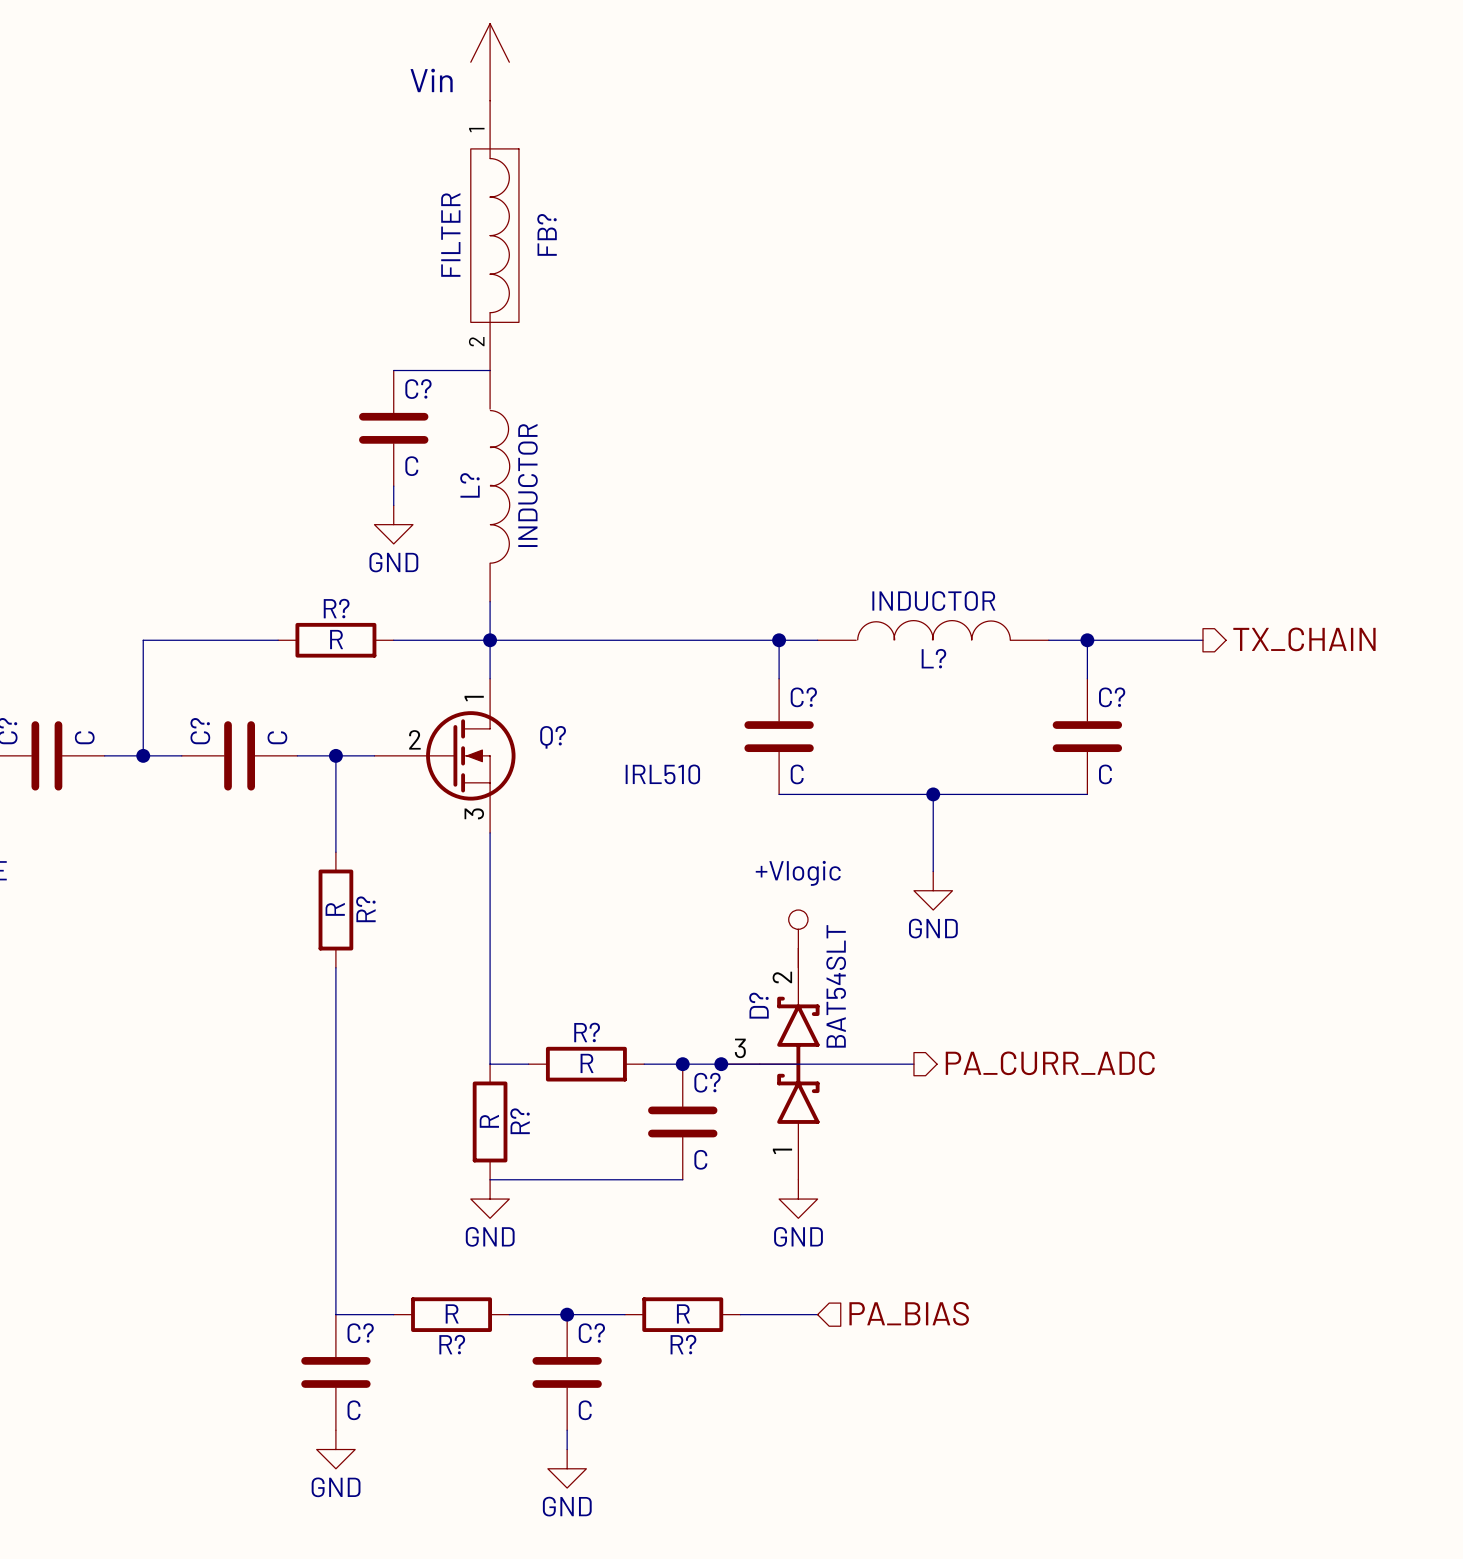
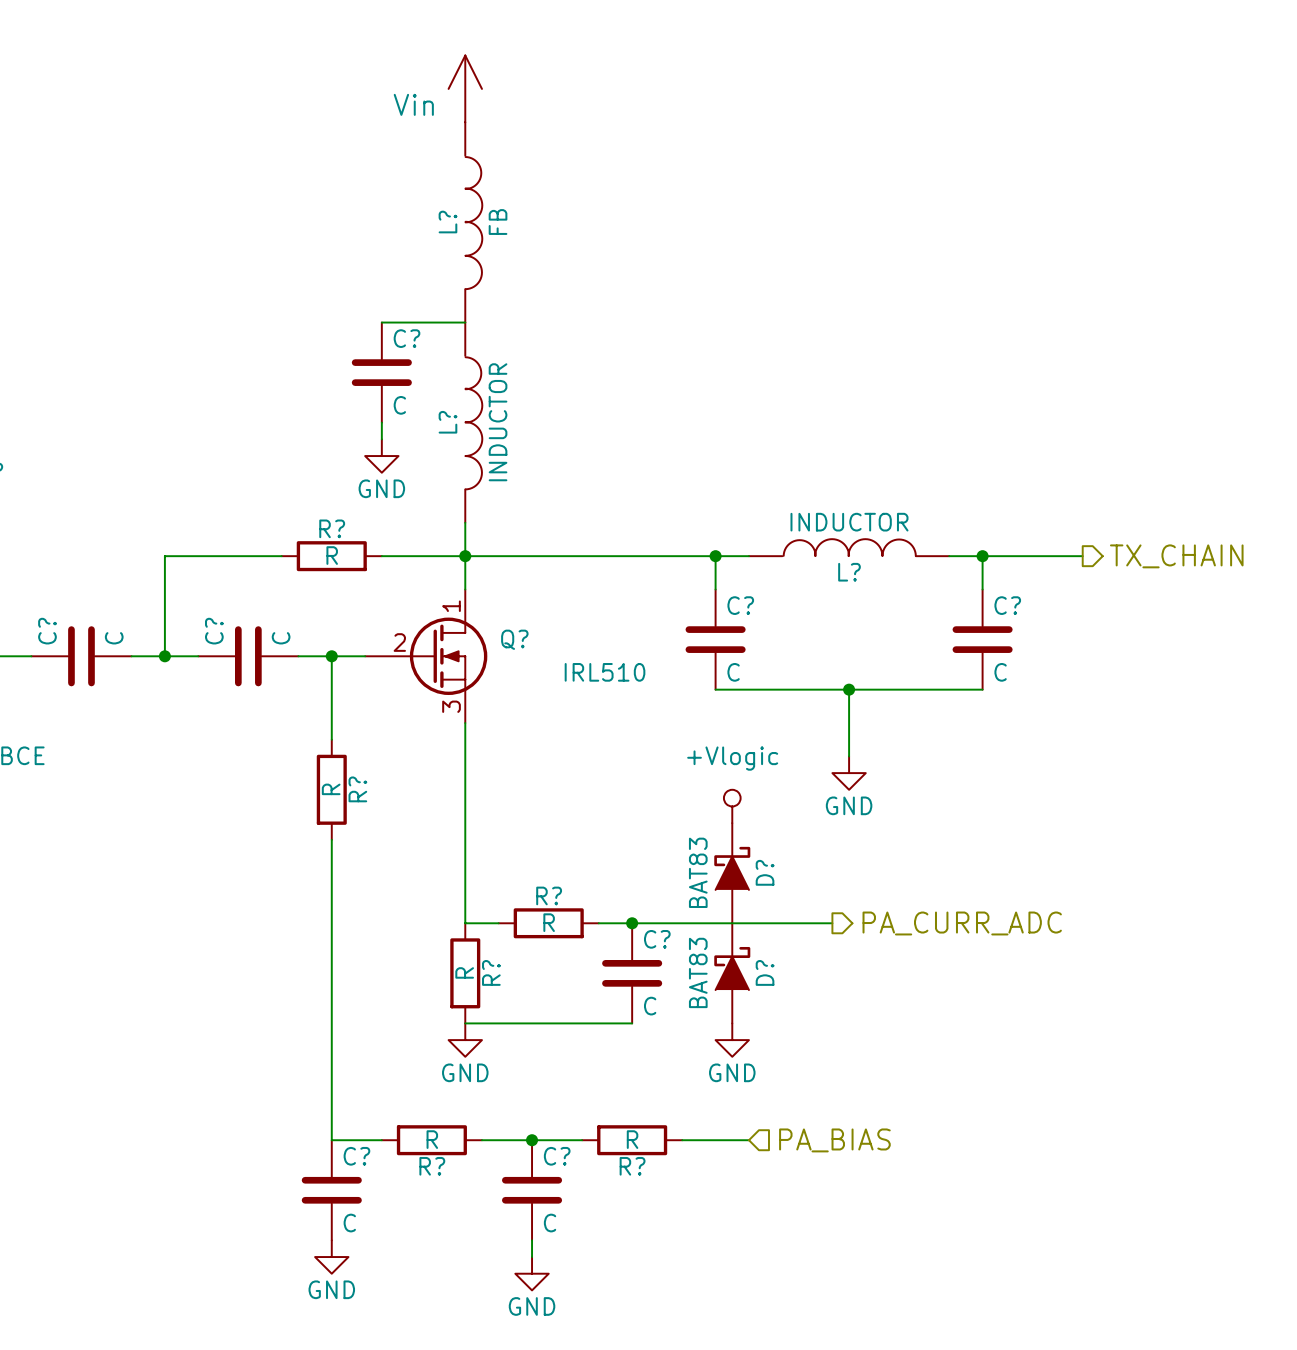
power symbol position: Vin (490, 62) -> Vin (465, 88)
FB?: FILTER (494, 235) -> none
L?: none -> FB (473, 222)
D?: none -> BAT83 (732, 873)
junction: (721, 1064) -> none
D?: BAT54SLT (770, 1064) -> none
D?: none -> BAT83 (732, 973)

